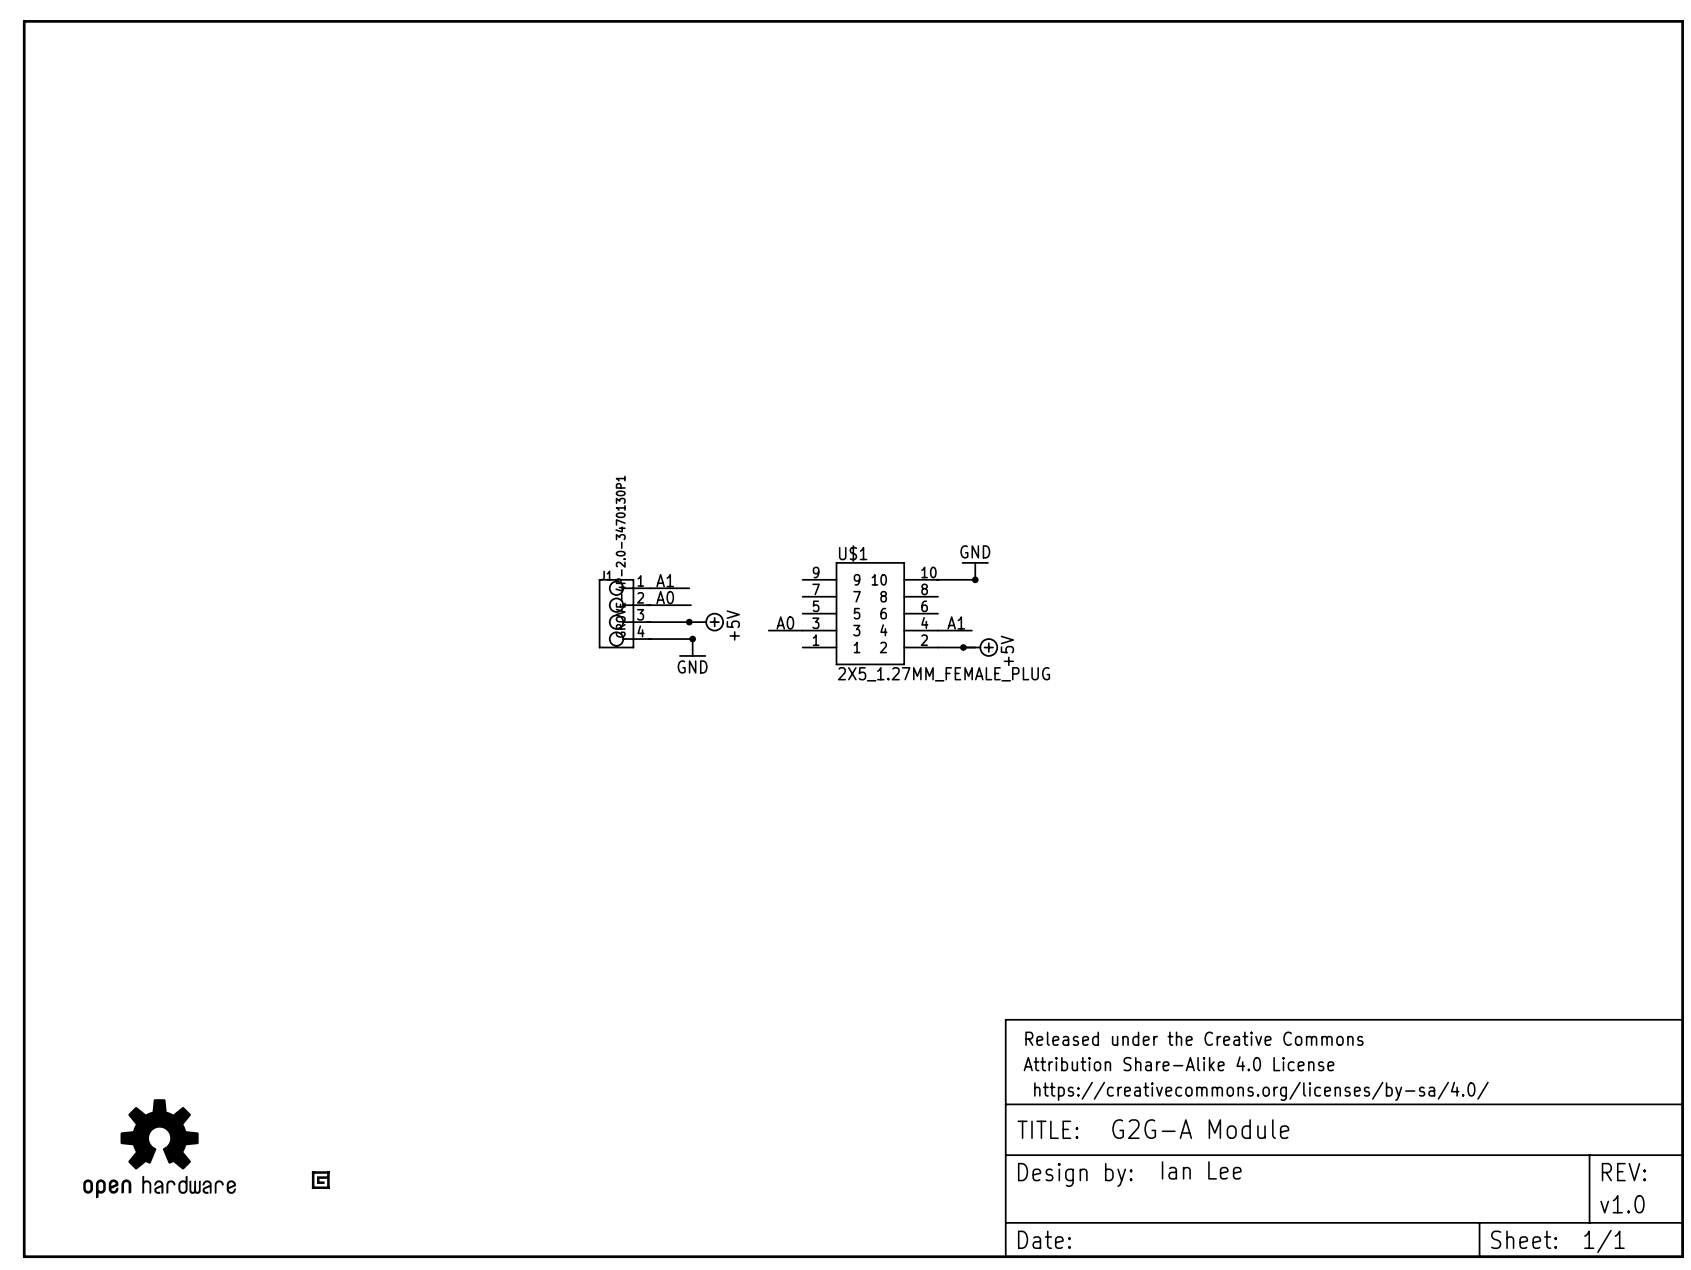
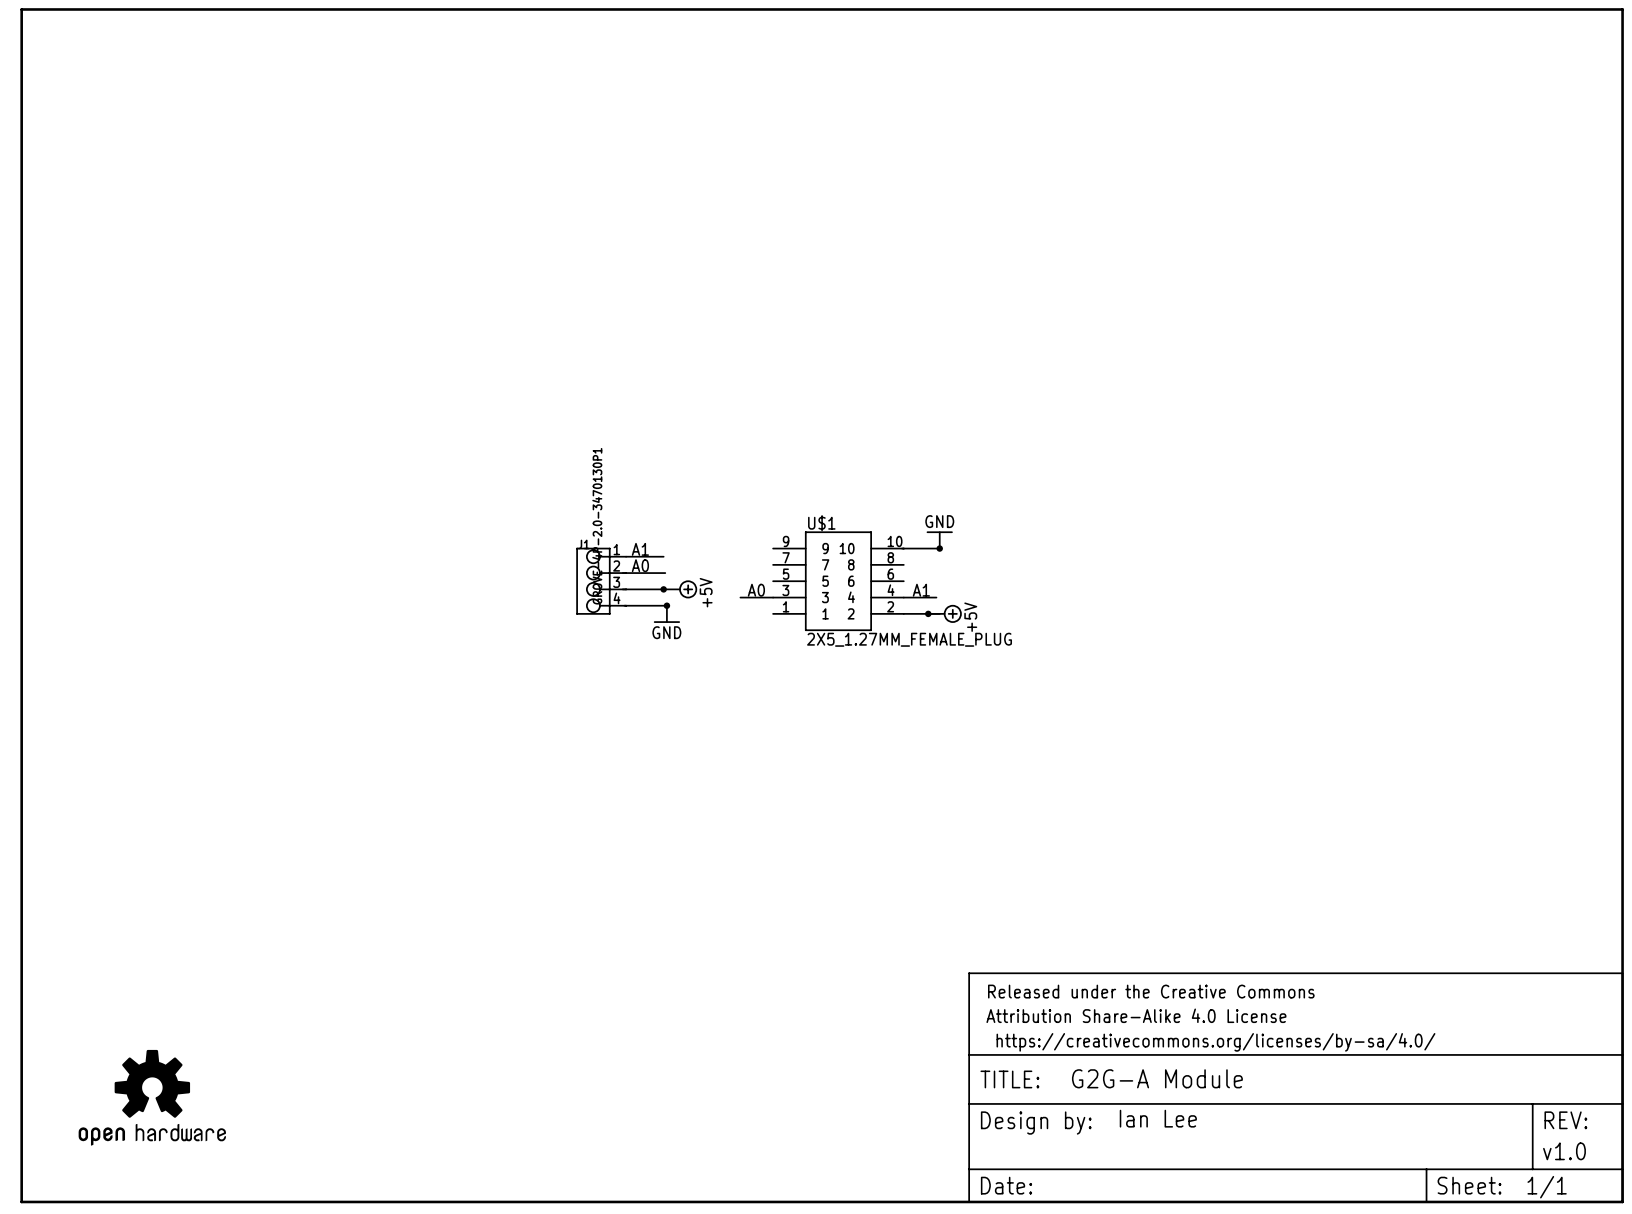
part: (320, 1180) -> none

